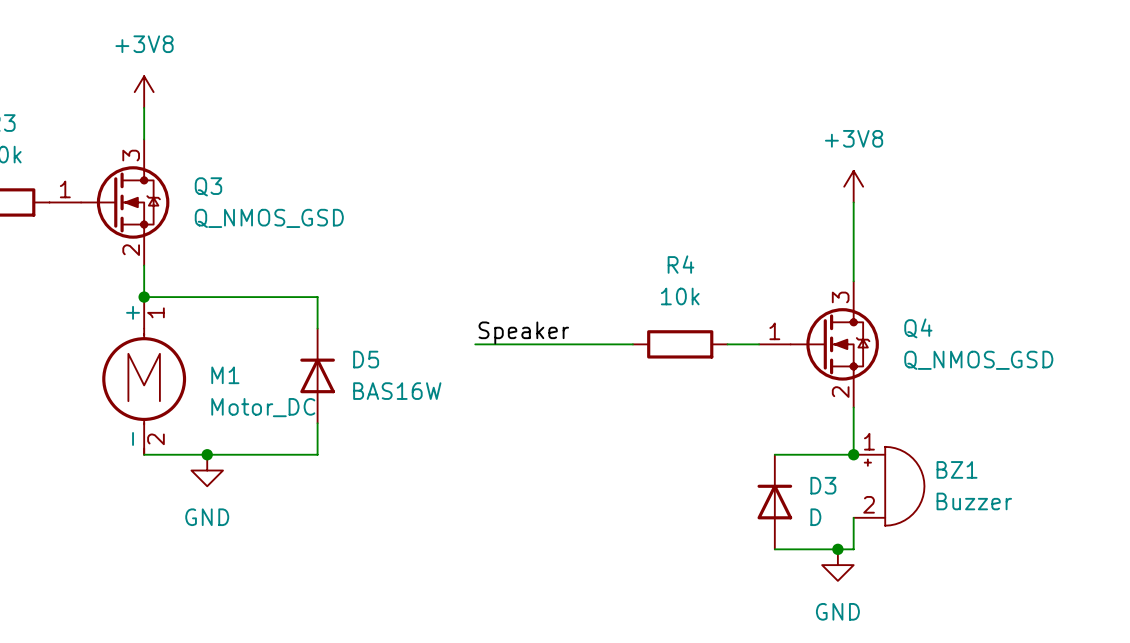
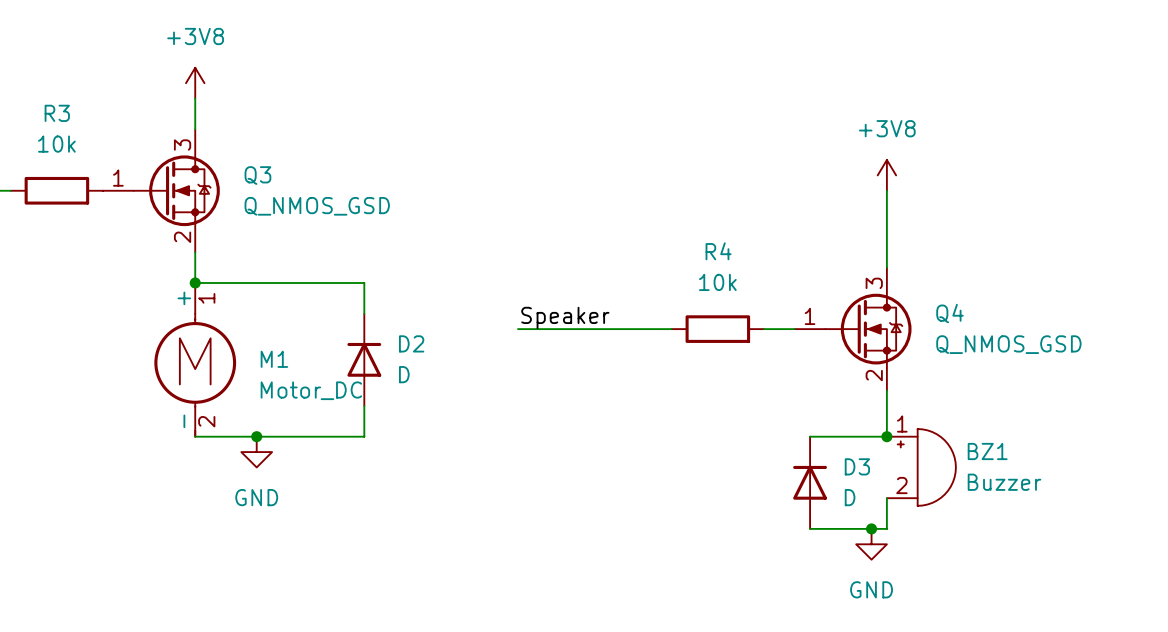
D5 name: D5 (366, 359) -> D2 (411, 343)
D5 value: BAS16W (397, 391) -> D (404, 374)

